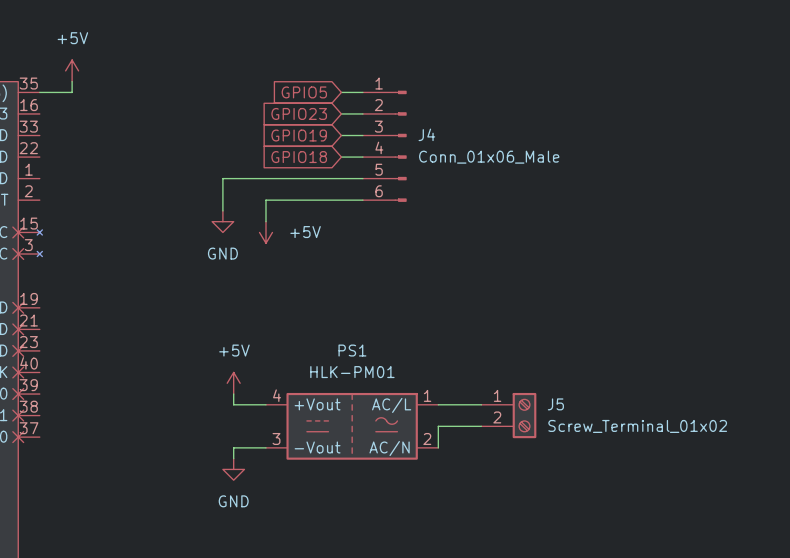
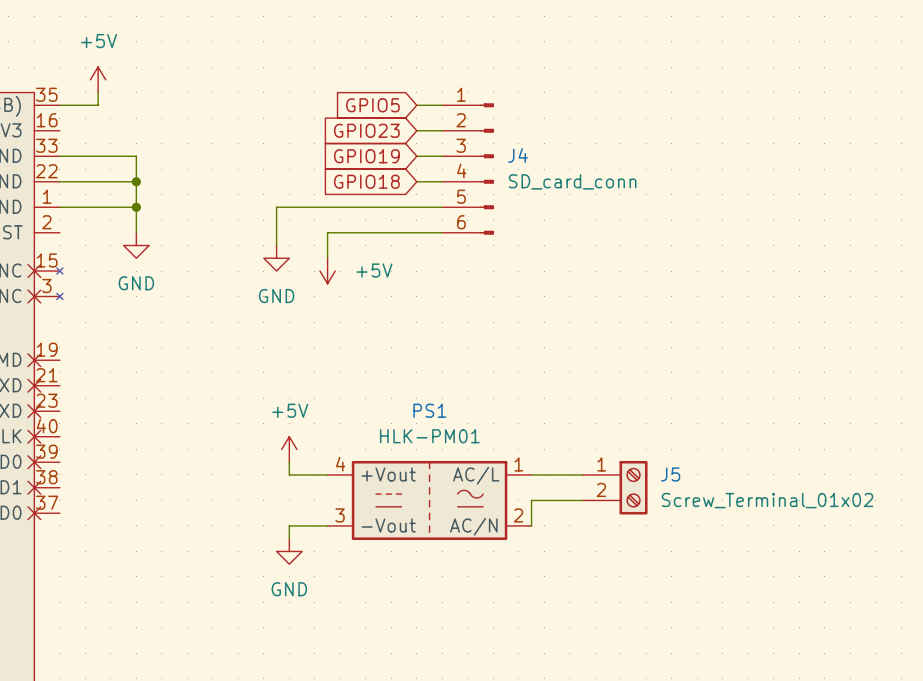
wire: none -> (59, 156) (136, 156) (136, 232)
wire: none -> (59, 181) (136, 181)
junction: none -> (136, 181)
J4 value: Conn_01x06_Male (489, 157) -> SD_card_conn (572, 181)
wire: none -> (59, 207) (136, 207)
junction: none -> (136, 207)
power symbol: none -> GND (136, 245)

